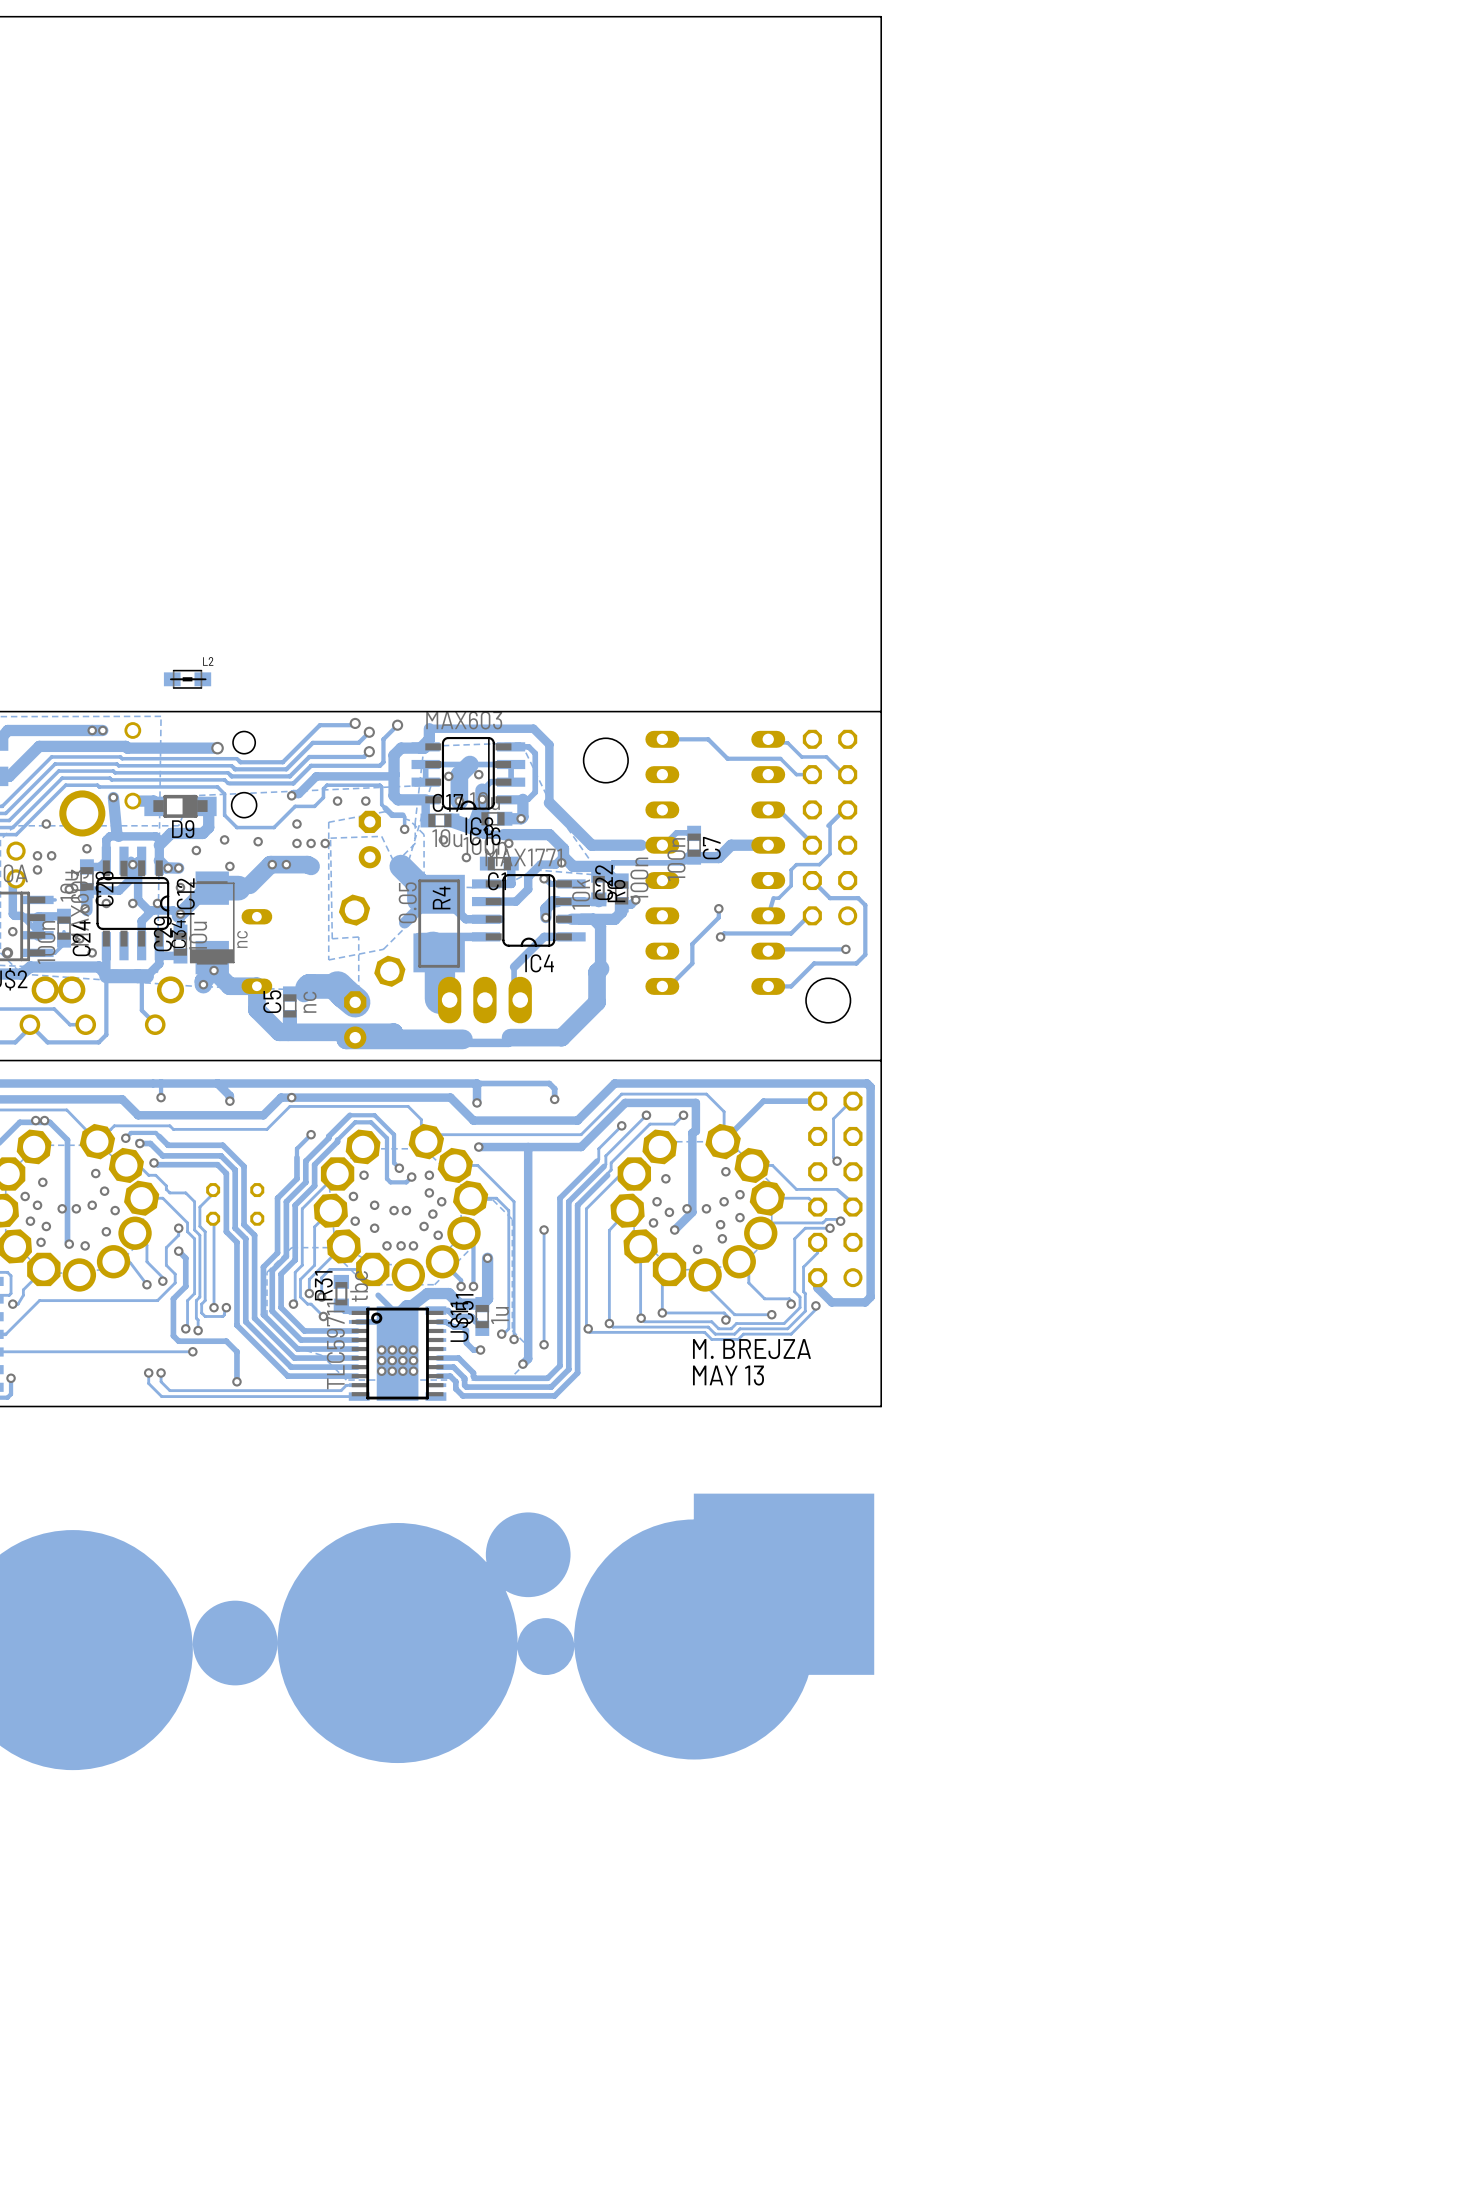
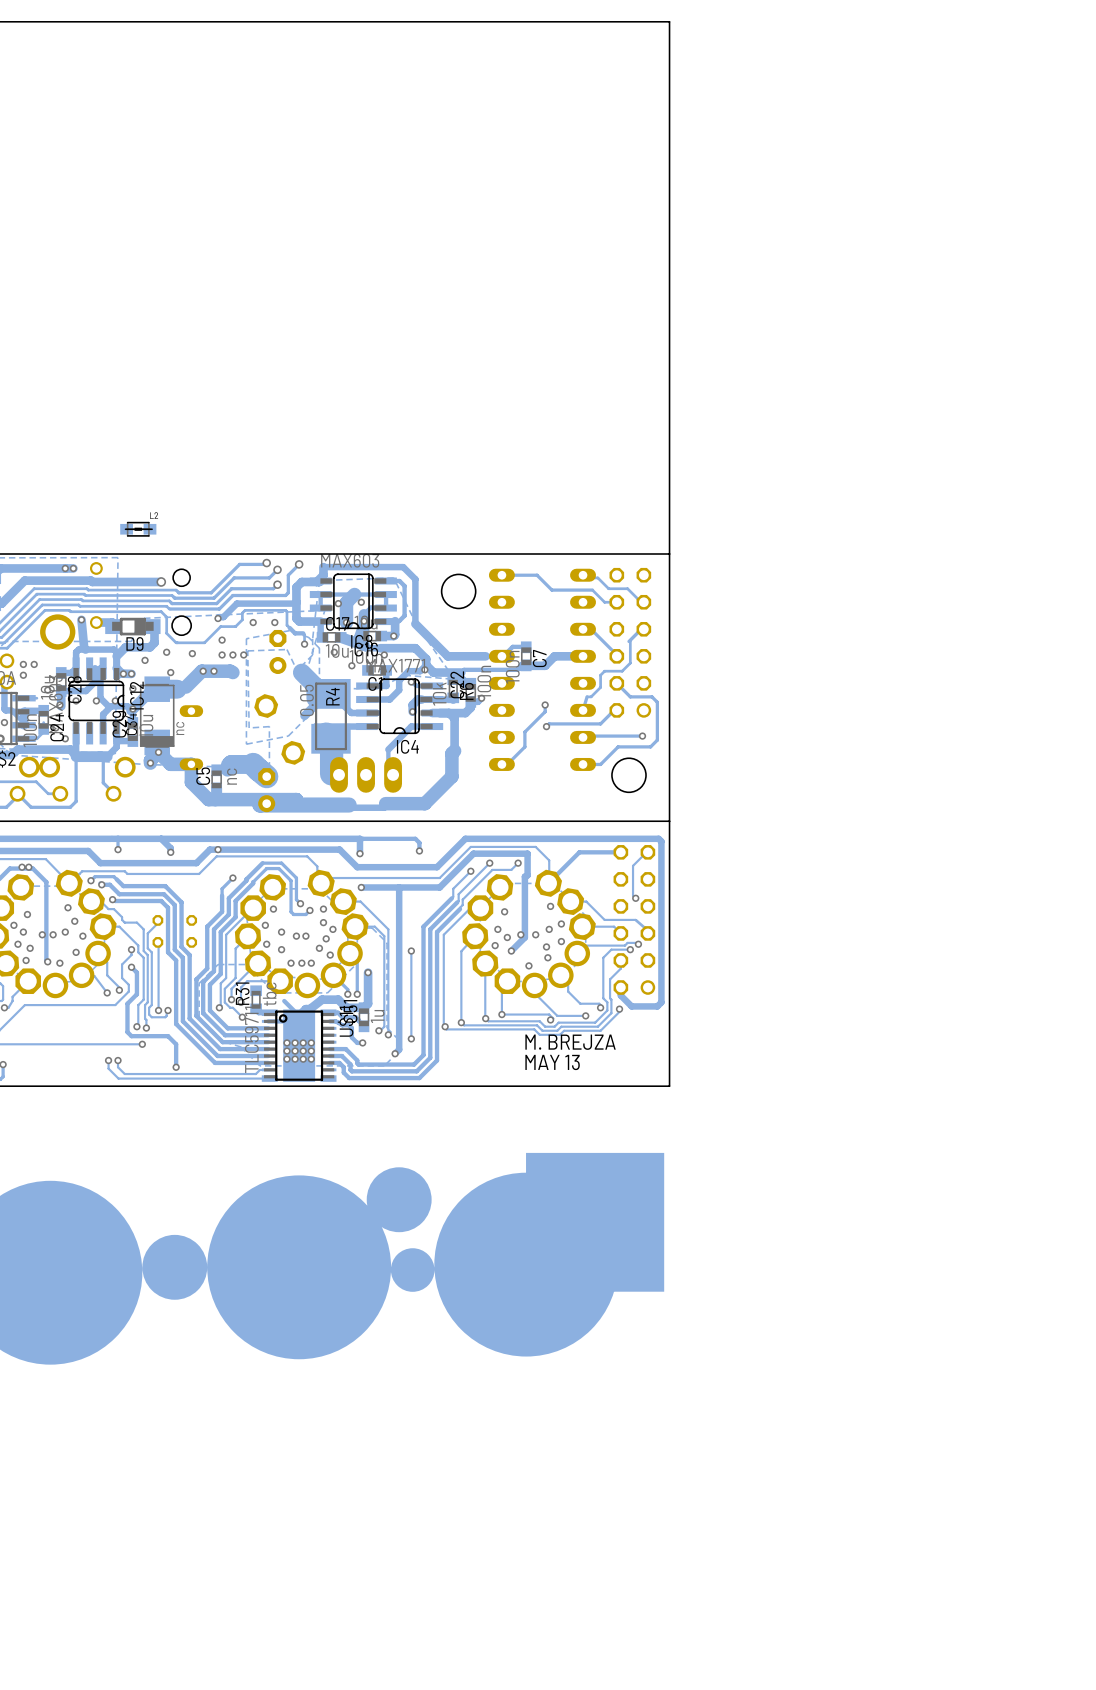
via: (46, 824) -> none
via: (86, 848) -> none
via: (132, 864) -> none

